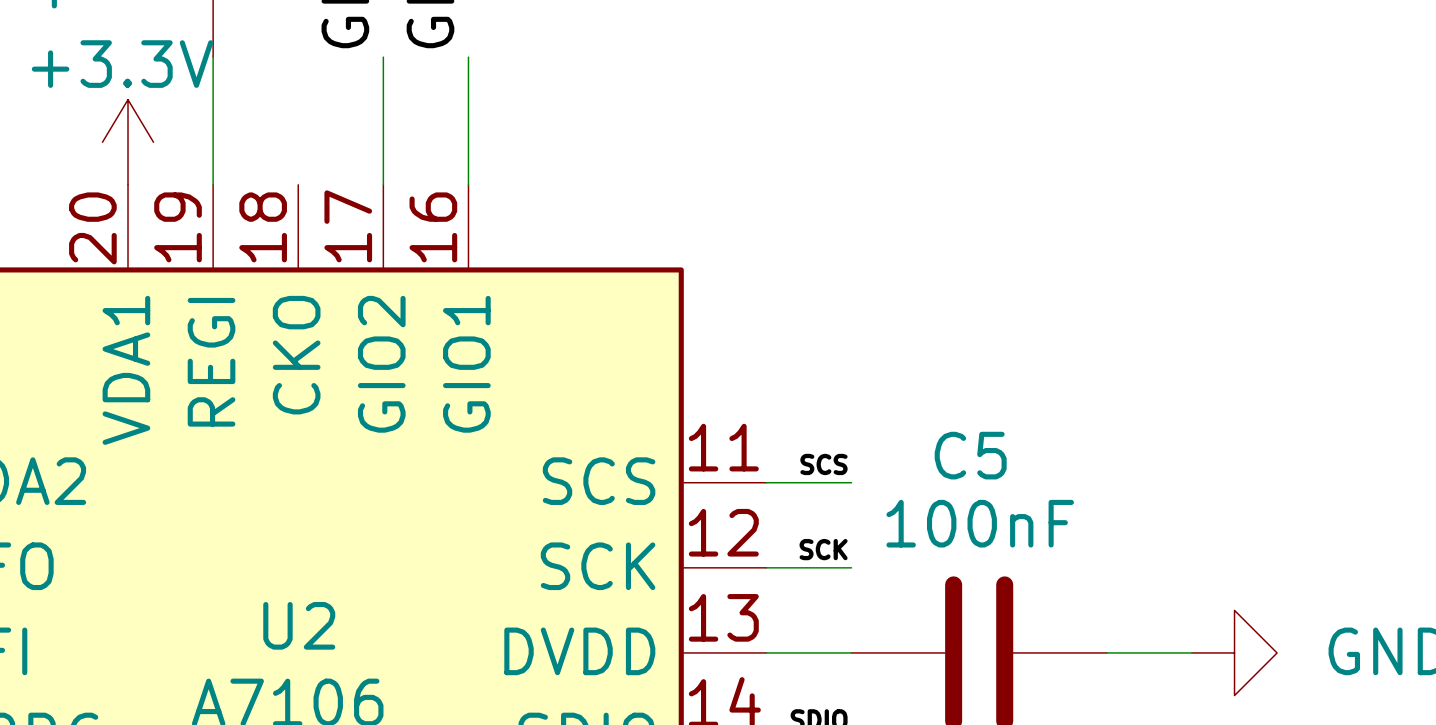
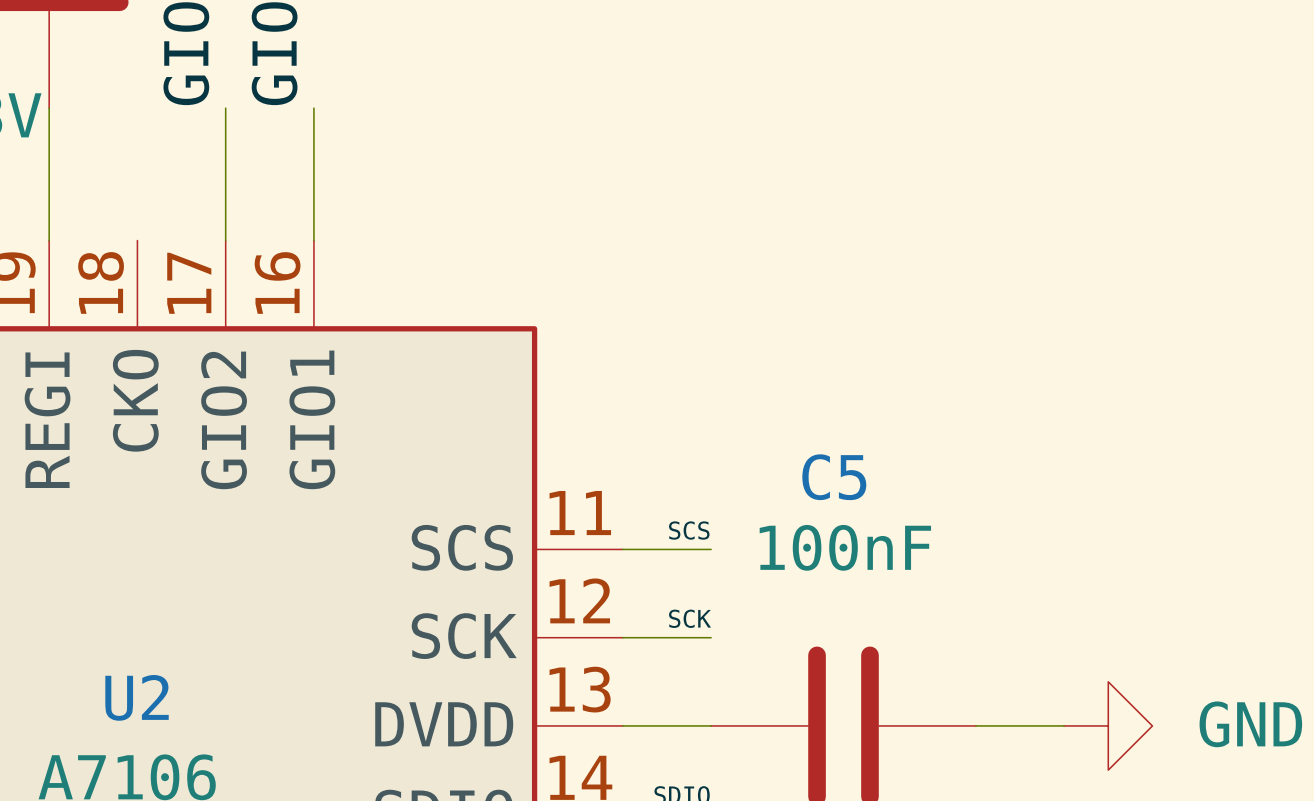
C5 name position: C5 (970, 455) -> C5 (834, 477)
C5 value position: 100nF (980, 523) -> 100nF (845, 547)

